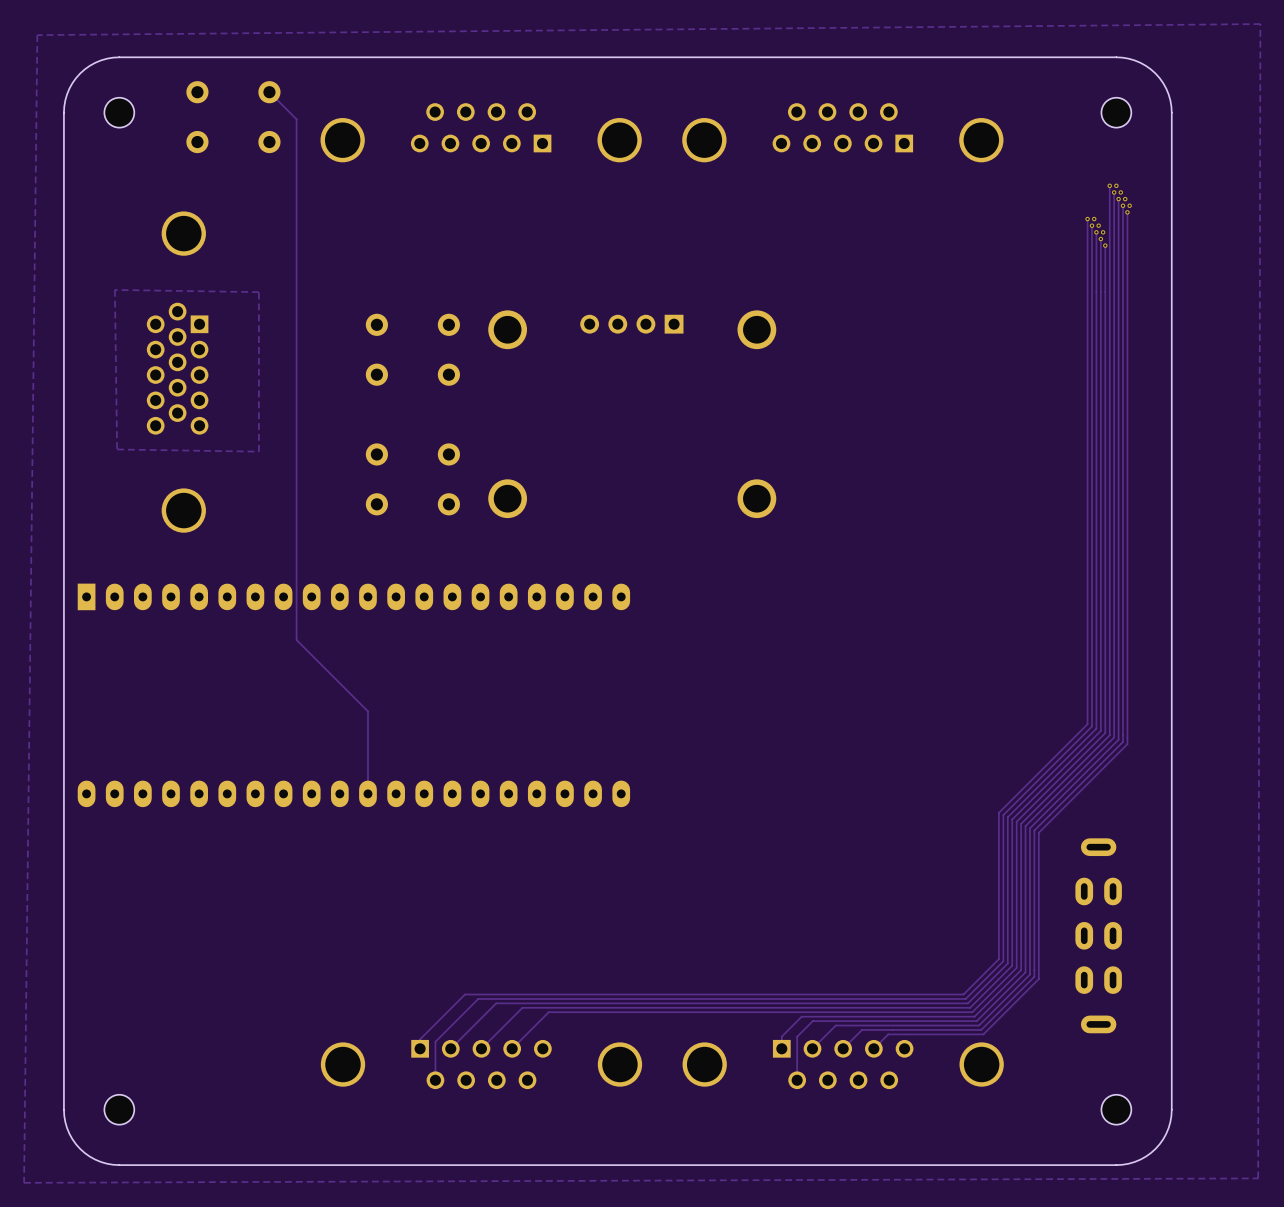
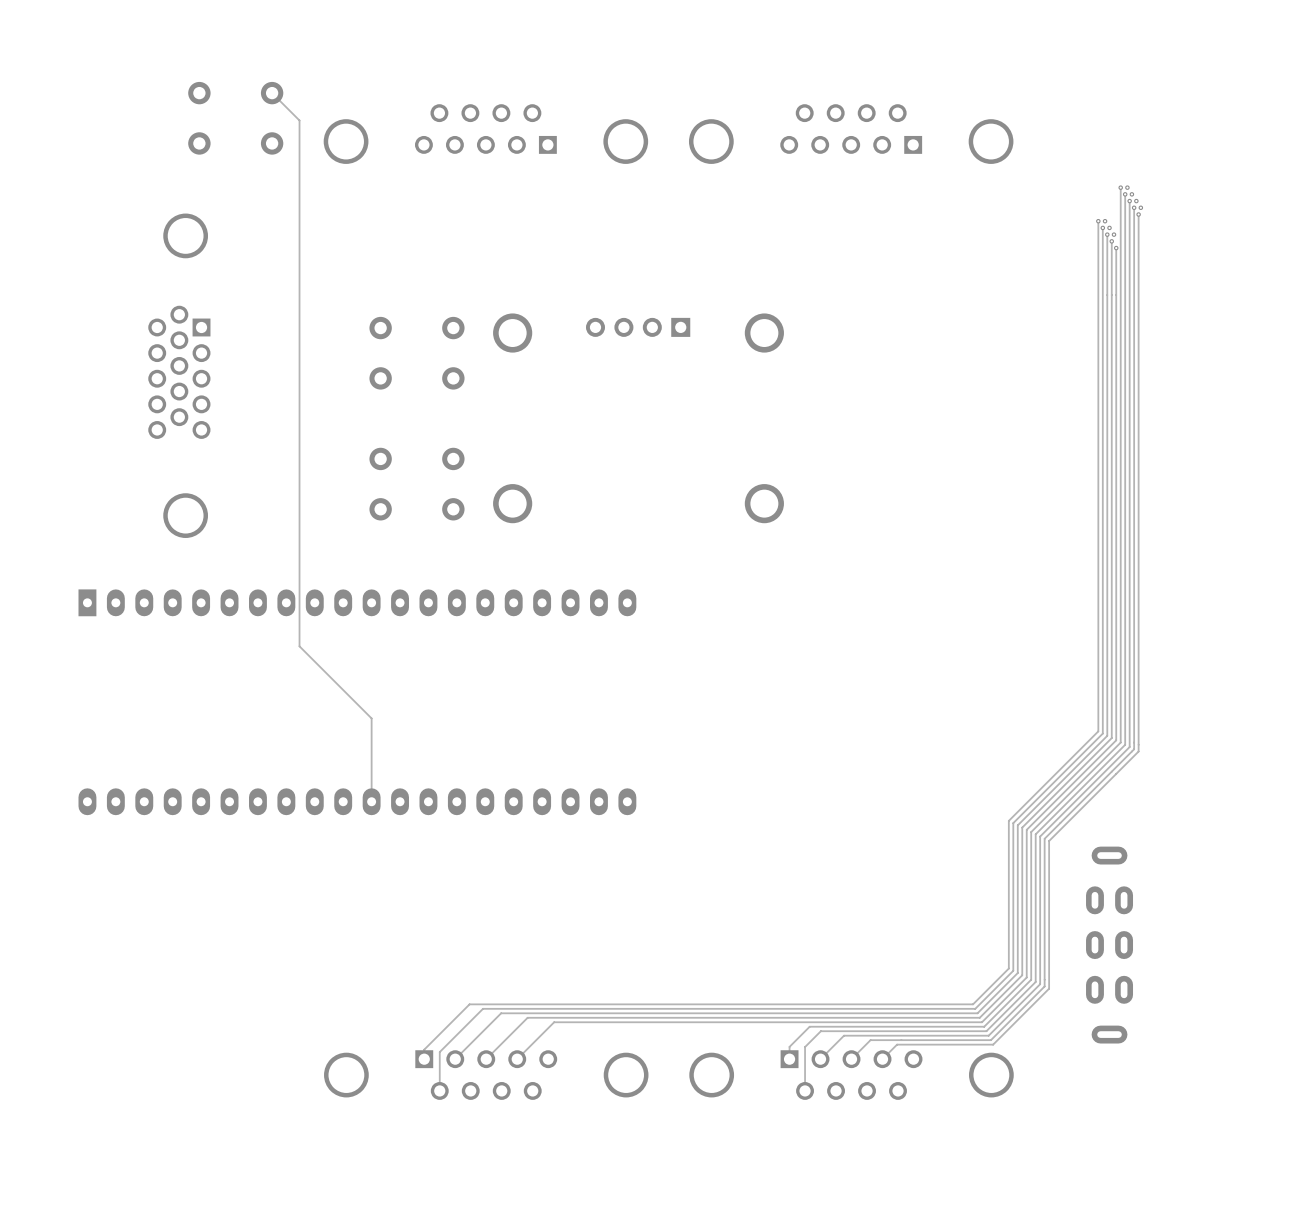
zone outline: (1260, 24) (1258, 1178) (24, 1182) (37, 35) (1260, 24) -> none
board edge: (1116, 57) (119, 57) (95, 62) (80, 73) (67, 94) (63, 112) (63, 1109) (69, 1133) (80, 1148) (101, 1162) (119, 1165) (1116, 1165) (1140, 1159) (1155, 1148) (1166, 1133) (1171, 1109) (1171, 112) (1168, 94) (1155, 73) (1140, 62) (1116, 57) -> none
part: (119, 112) -> none
part: (1116, 112) -> none
zone outline: (114, 289) (258, 292) (258, 451) (117, 449) (114, 289) -> none
part: (119, 1109) -> none
part: (1116, 1109) -> none

